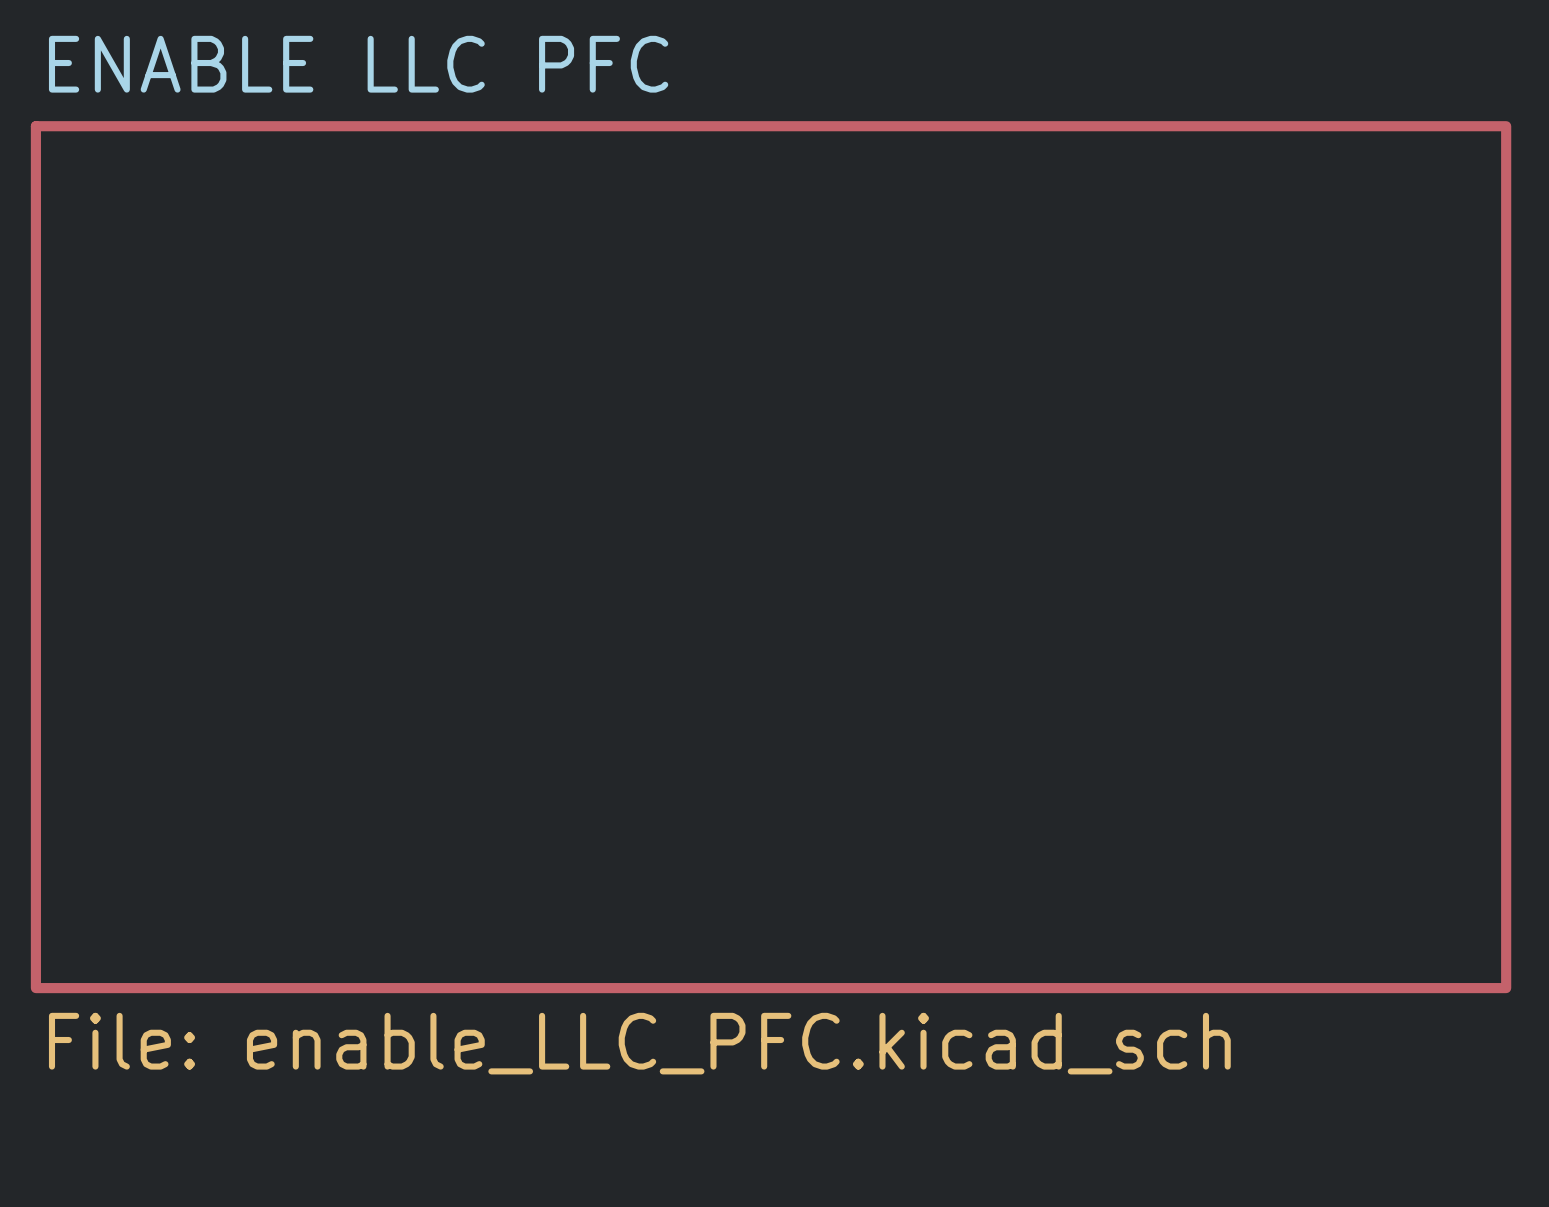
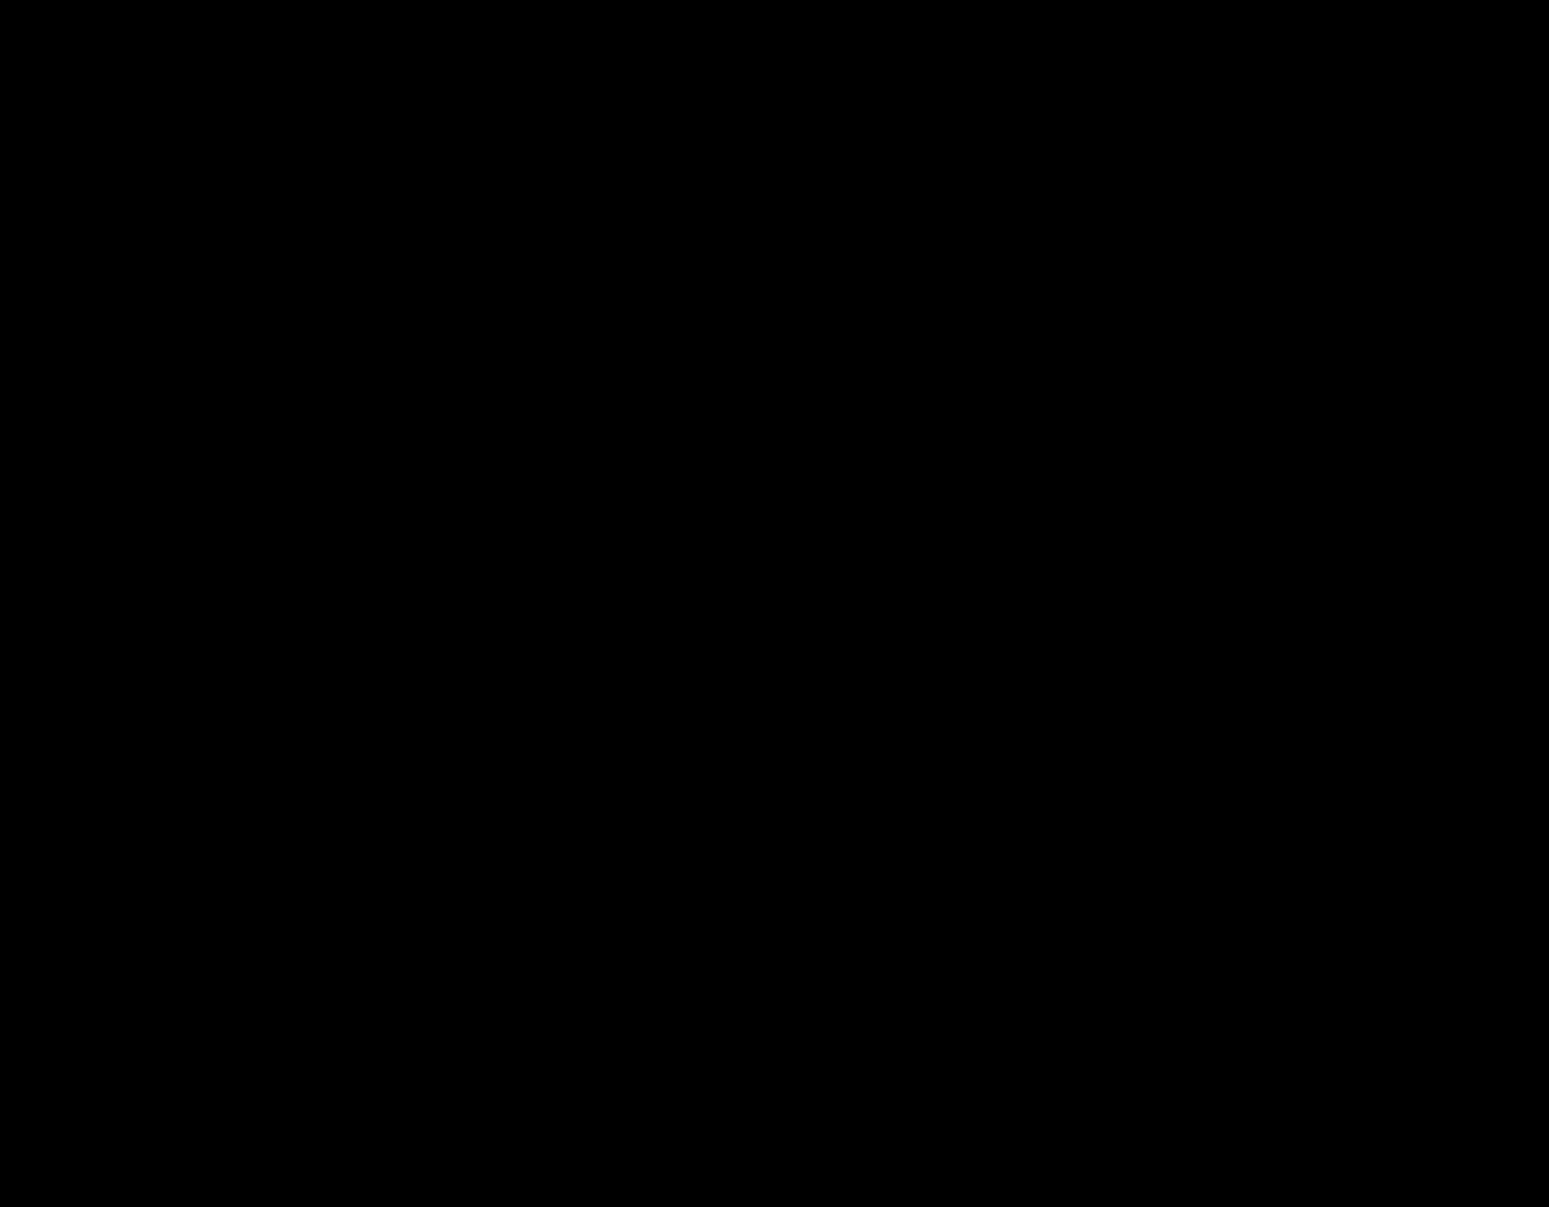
sheet ENABLE LLC PFC: File: enable_LLC_PFC.kicad_sch (771, 557) -> none

